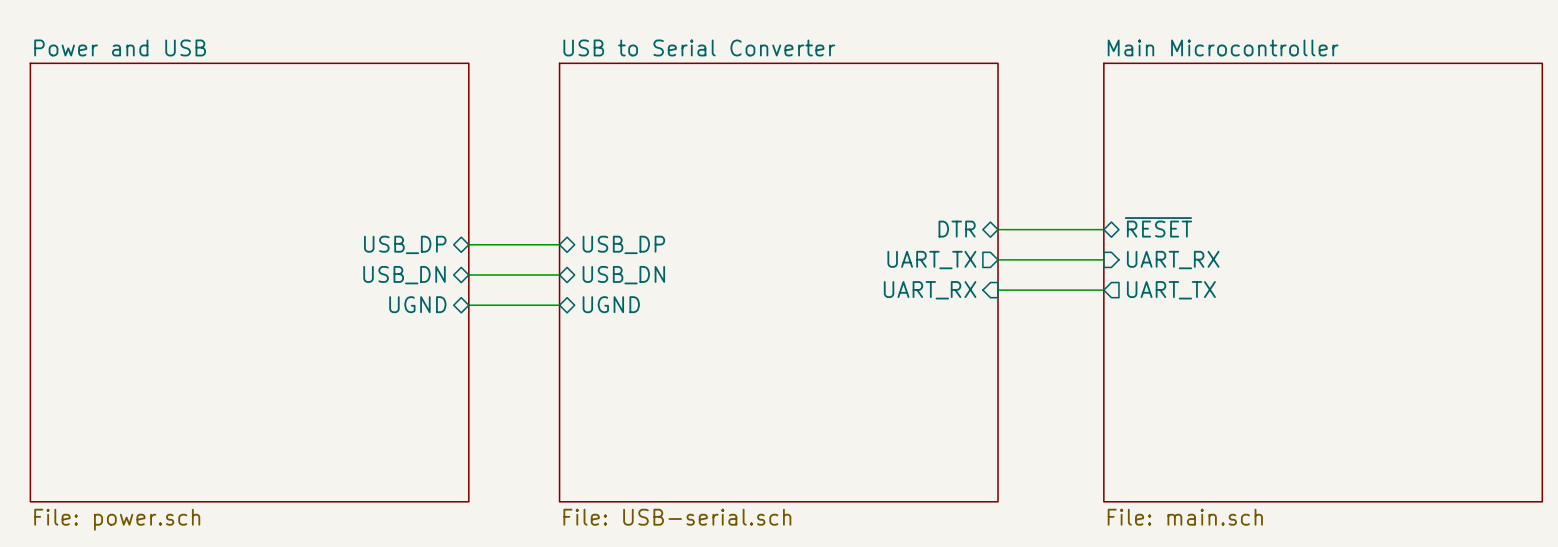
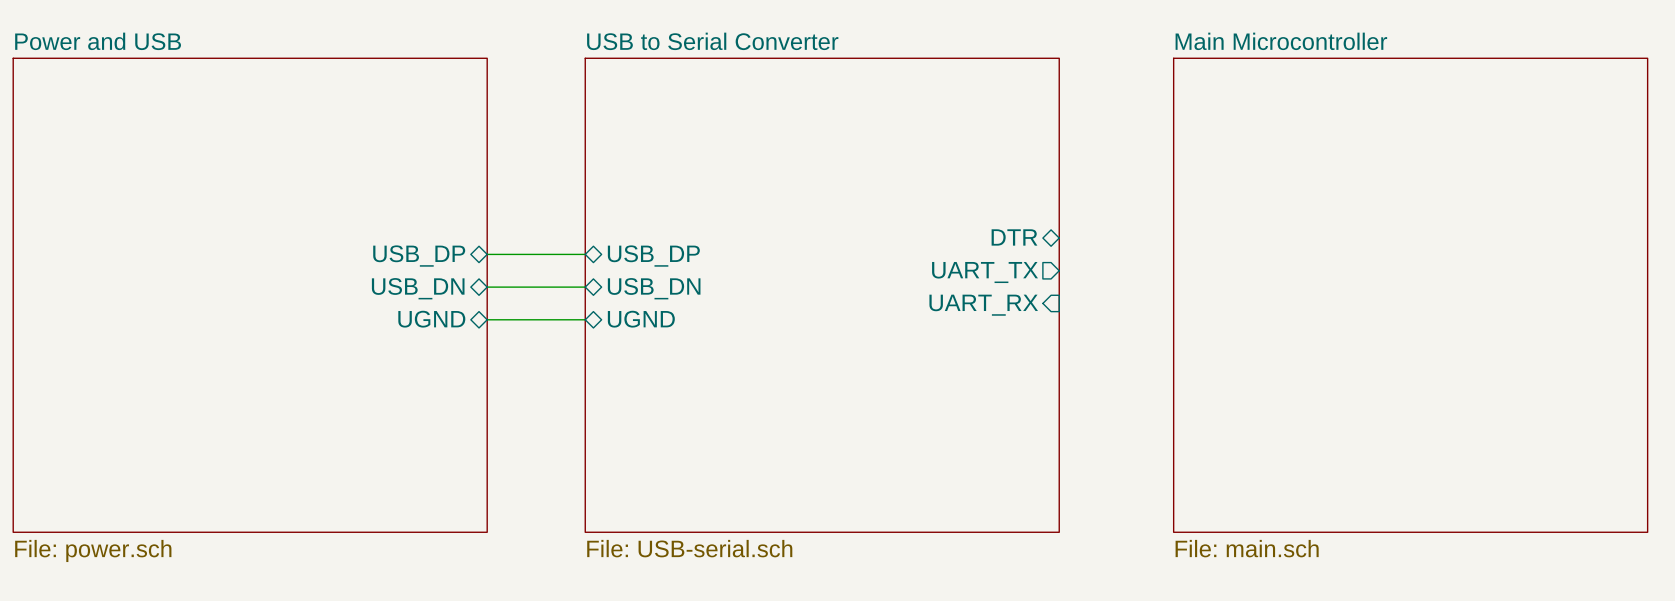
sheet pin: ~{RESET} (1158, 227) -> none
wire: (998, 229) (1103, 229) -> none
wire: (998, 259) (1103, 259) -> none
sheet pin: UART_RX (1173, 260) -> none
wire: (998, 290) (1103, 290) -> none
sheet pin: UART_TX (1171, 290) -> none

